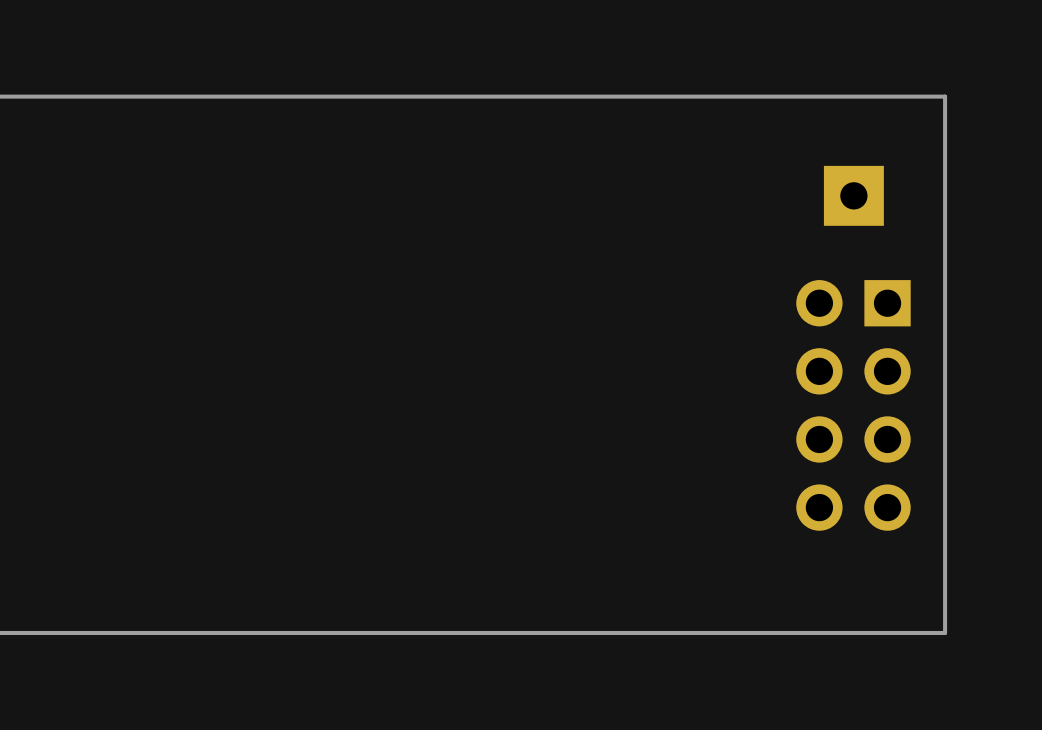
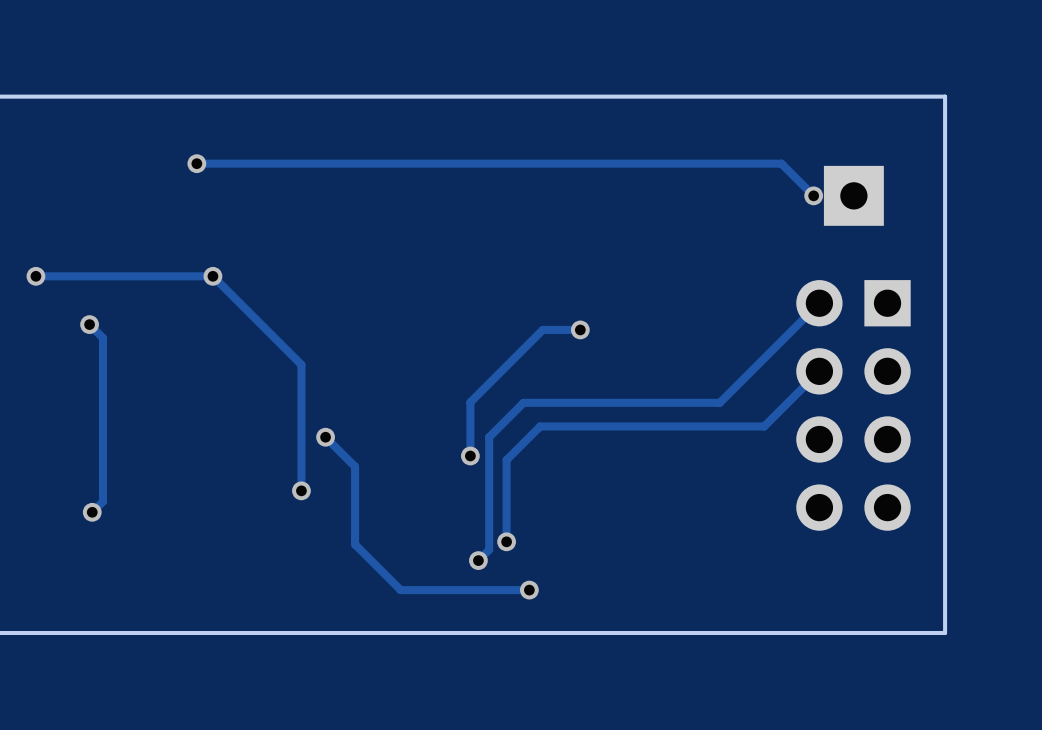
track: none -> (196, 163) (781, 163) (813, 195)
via: none -> (196, 163)
via: none -> (813, 195)
track: none -> (35, 276) (212, 276) (301, 364) (301, 490)
via: none -> (35, 276)
via: none -> (212, 276)
track: none -> (819, 303) (719, 402) (523, 402) (489, 437) (489, 549) (478, 560)
track: none -> (89, 324) (102, 337) (102, 501) (92, 512)
via: none -> (89, 324)
track: none -> (580, 329) (542, 329) (470, 402) (470, 455)
via: none -> (580, 329)
track: none -> (819, 371) (764, 426) (540, 426) (506, 460) (506, 541)
track: none -> (325, 437) (355, 466) (355, 544) (400, 590) (529, 590)
via: none -> (325, 437)
via: none -> (470, 455)
via: none -> (301, 490)
via: none -> (92, 512)
via: none -> (506, 541)
via: none -> (478, 560)
via: none -> (529, 590)

